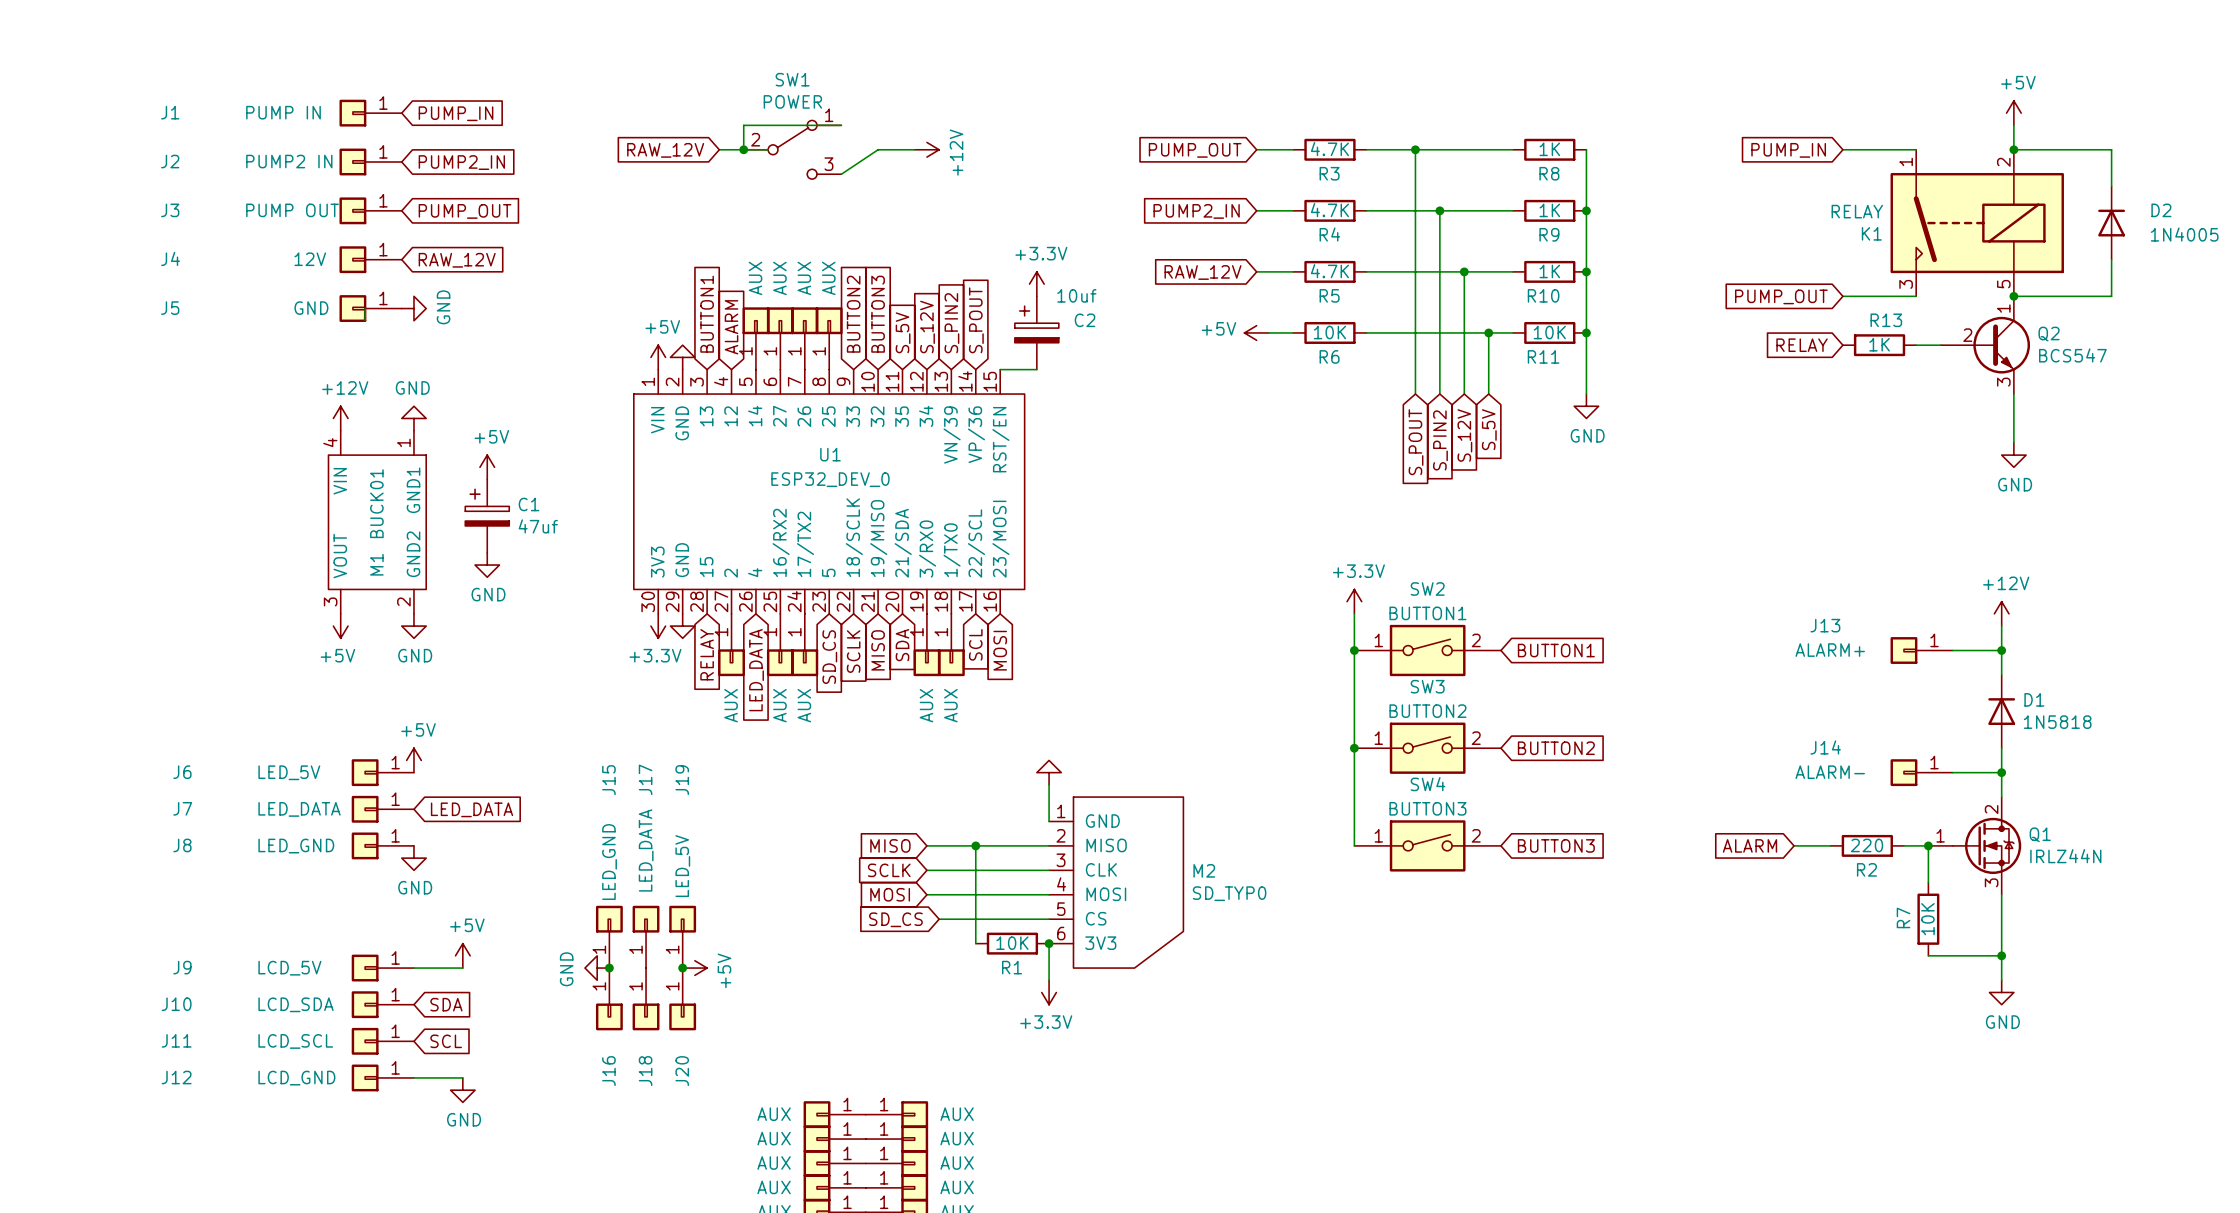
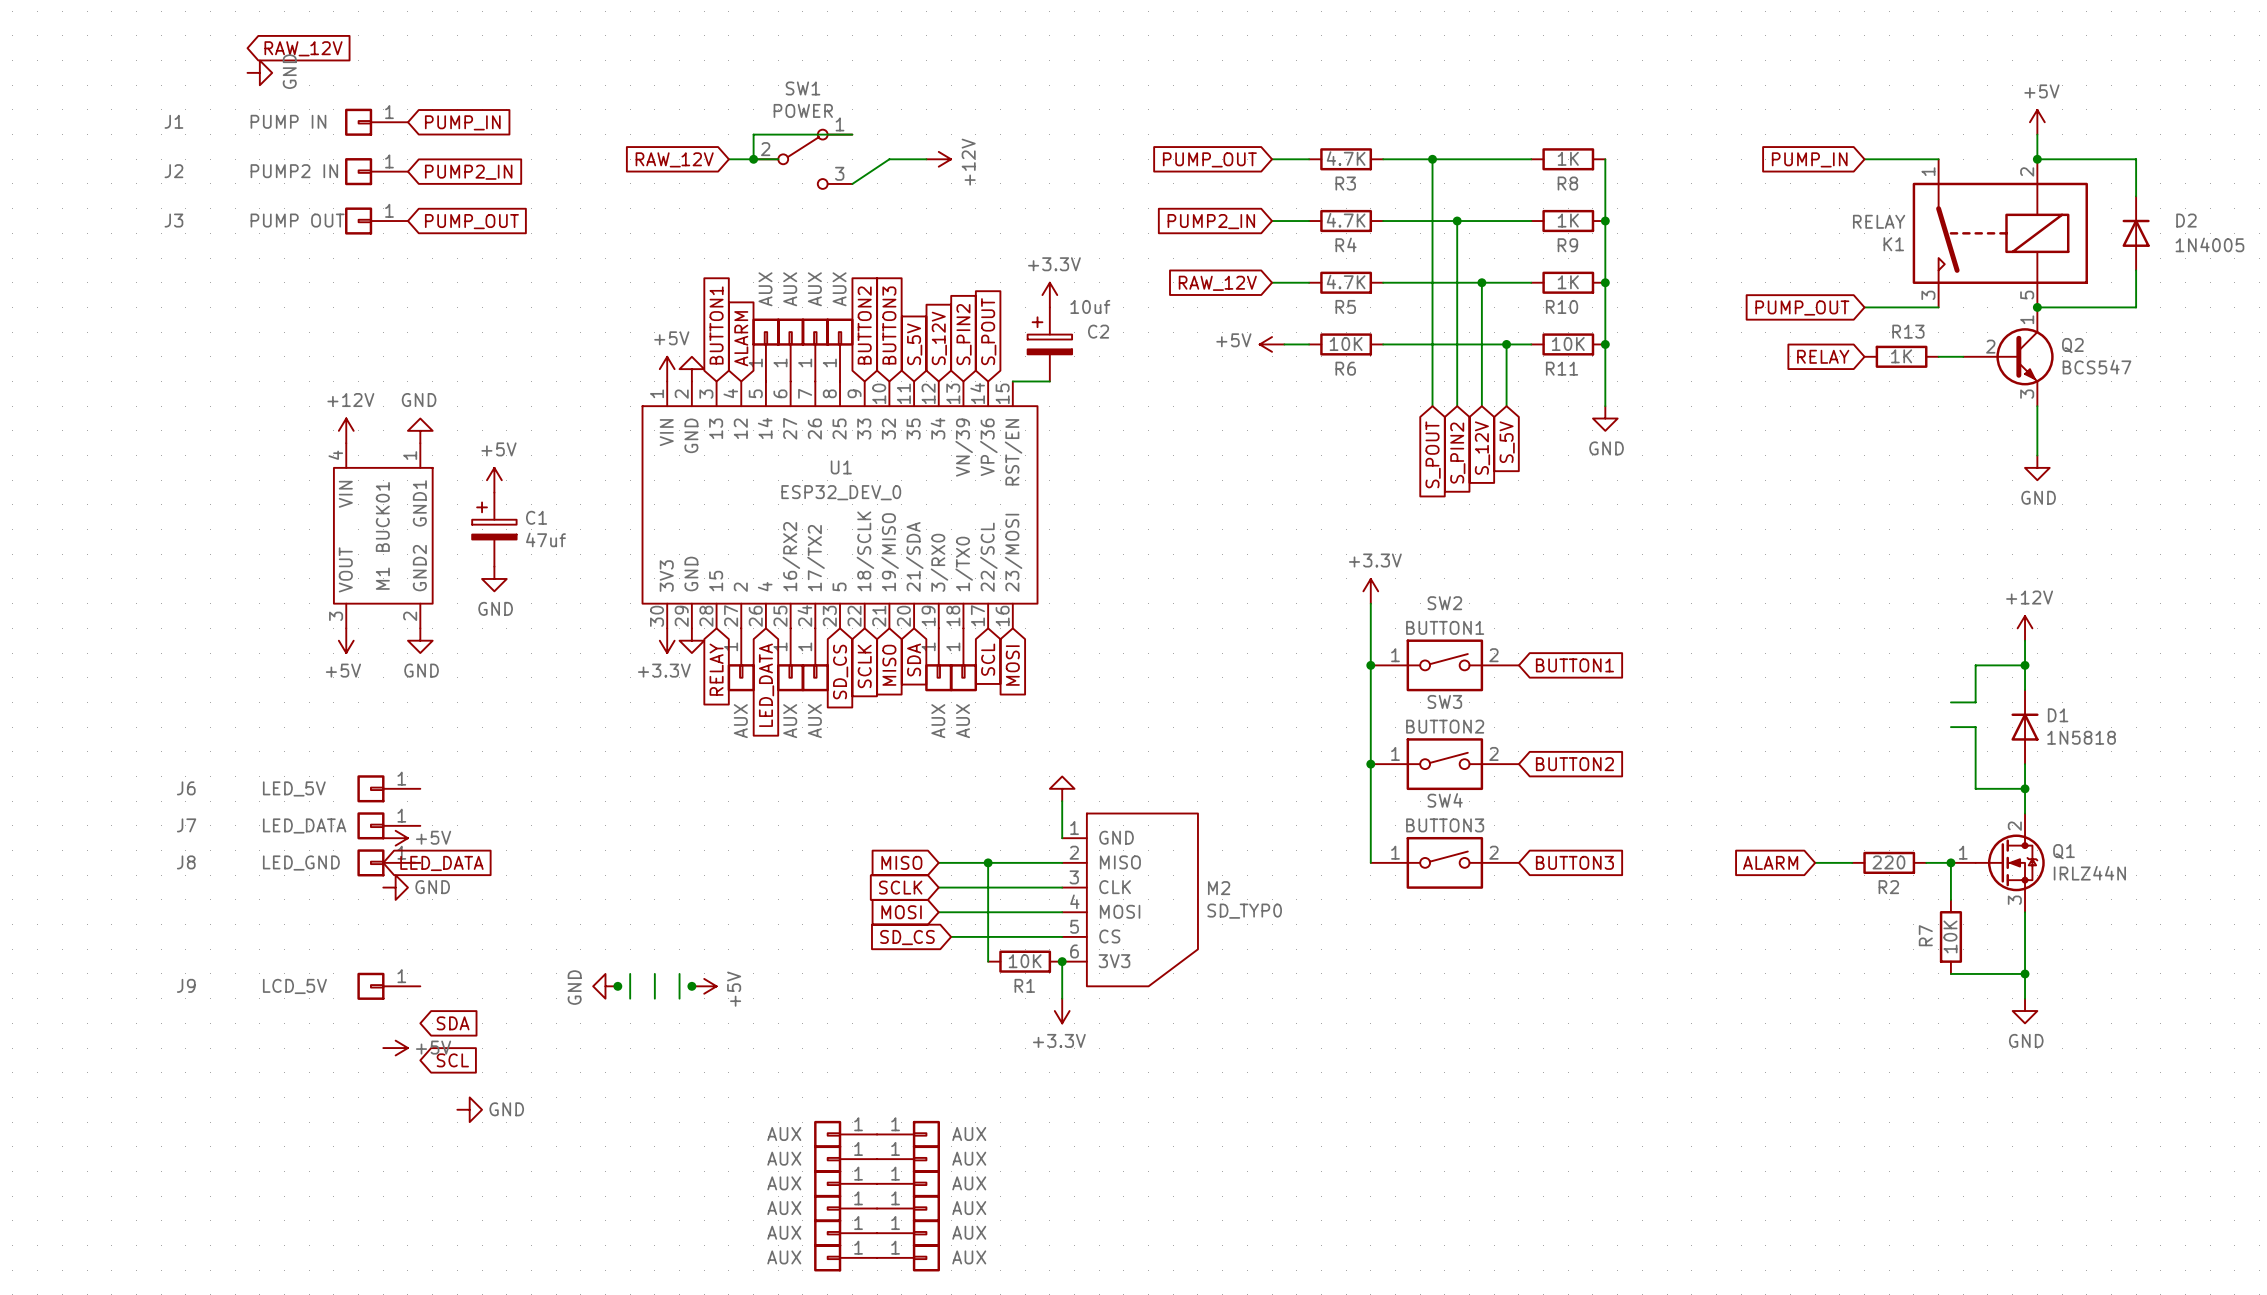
global label: none -> RAW_12V (303, 48)
power symbol: none -> GND (259, 72)
J4: 12V (370, 259) -> none
global label: RAW_12V (457, 260) -> none
wire: (365, 308) (365, 320) -> none
J5: GND (370, 308) -> none
power symbol: GND (413, 308) -> none
power symbol position: +3.3V (1354, 601) -> +3.3V (1370, 591)
J13: ALARM+ (1921, 650) -> none
wire: none -> (1975, 665) (1975, 702) (1950, 702)
wire: none -> (1950, 727) (1975, 727) (1975, 788)
power symbol rotation: 0° (413, 760) -> 90° clockwise (395, 838)
power symbol position: +5V (413, 760) -> +5V (395, 838)
J14: ALARM- (1921, 772) -> none
global label position: LED_DATA (472, 809) -> LED_DATA (441, 863)
power symbol rotation: 0° (413, 858) -> 90° counterclockwise (395, 887)
power symbol position: GND (413, 858) -> GND (395, 887)
J15: LED_GND (609, 936) -> none
J17: LED_DATA (646, 936) -> none
J19: LED_5V (682, 936) -> none
power symbol: +5V (462, 955) -> none
wire: none -> (630, 973) (630, 998)
wire: none -> (679, 973) (679, 998)
wire: (413, 968) (462, 968) -> none
J16: (609, 999) -> none
J18: (646, 999) -> none
J20: (682, 999) -> none
J10: LCD_SDA (382, 1004) -> none
power symbol: none -> +5V (395, 1048)
J11: LCD_SCL (382, 1041) -> none
J12: LCD_GND (382, 1077) -> none
wire: (413, 1077) (462, 1077) -> none
power symbol rotation: 0° (462, 1090) -> 90° counterclockwise (469, 1109)

